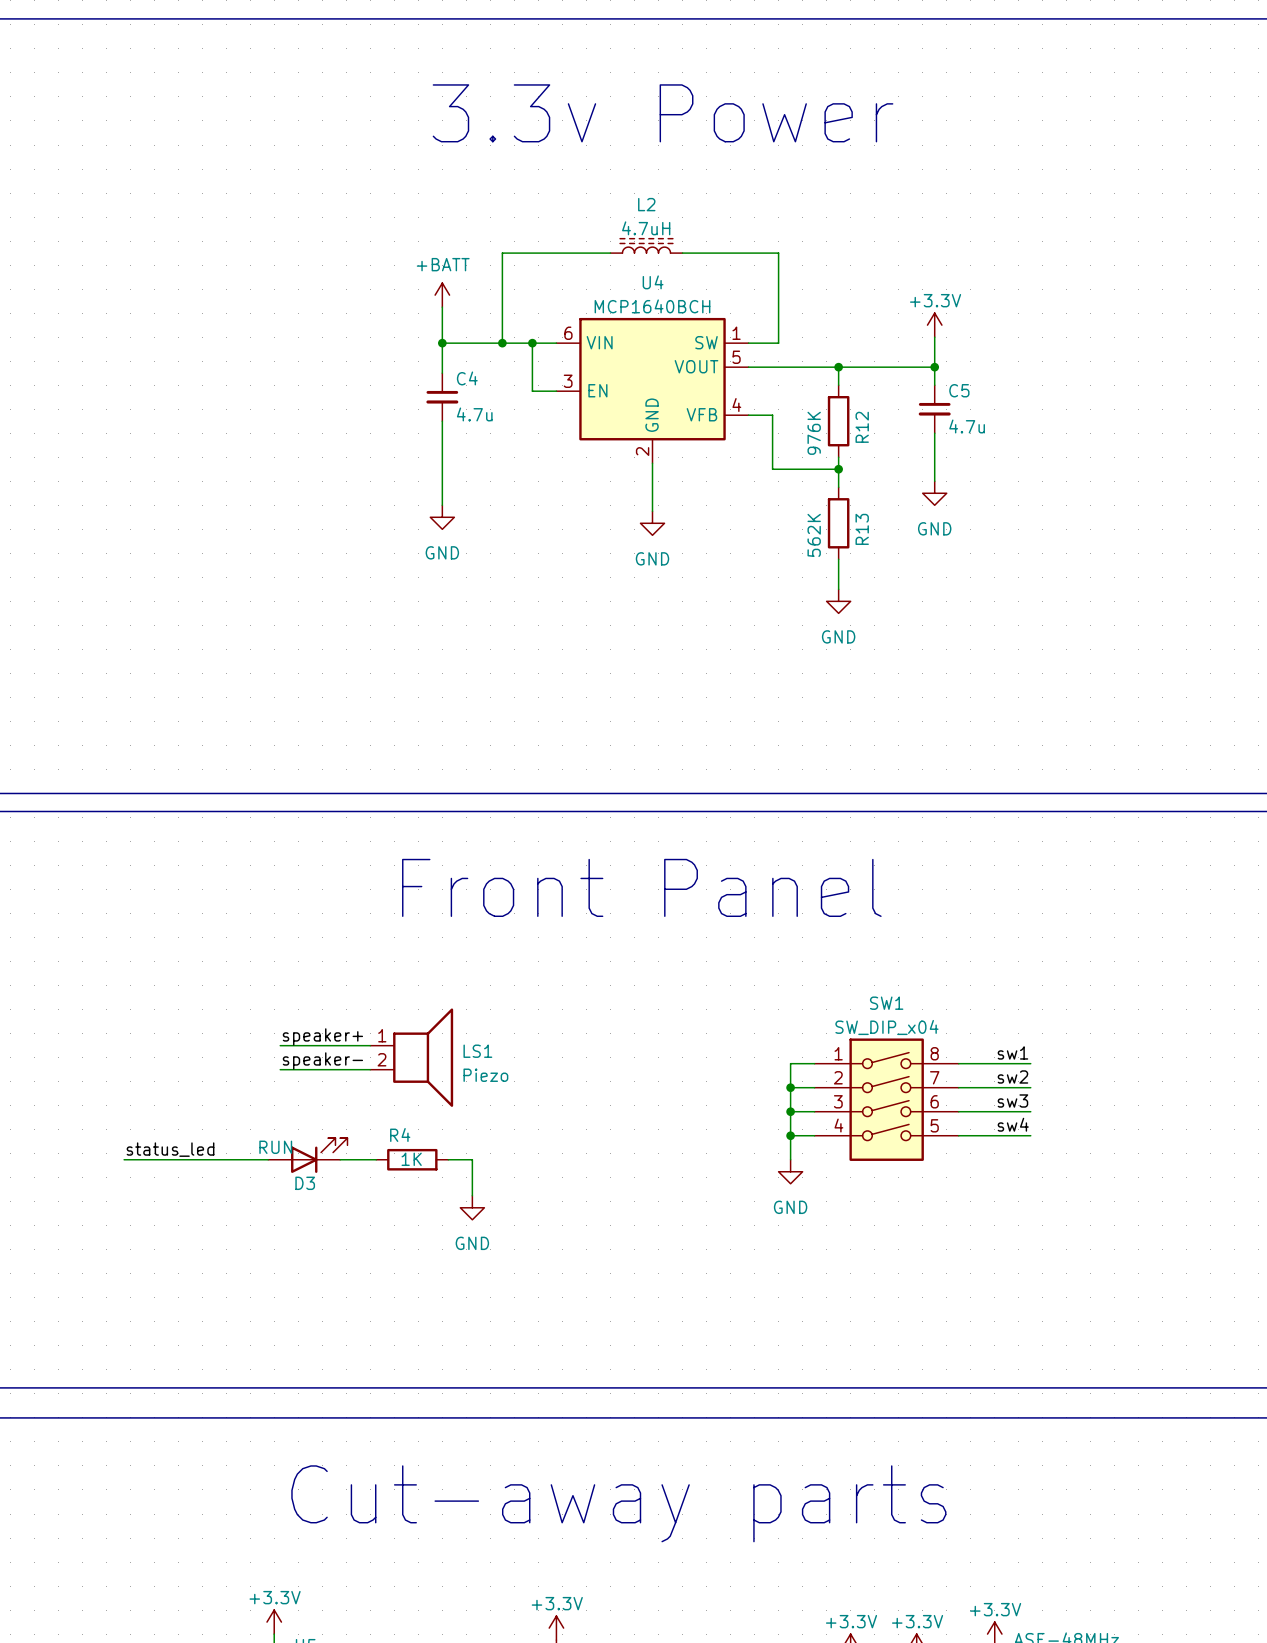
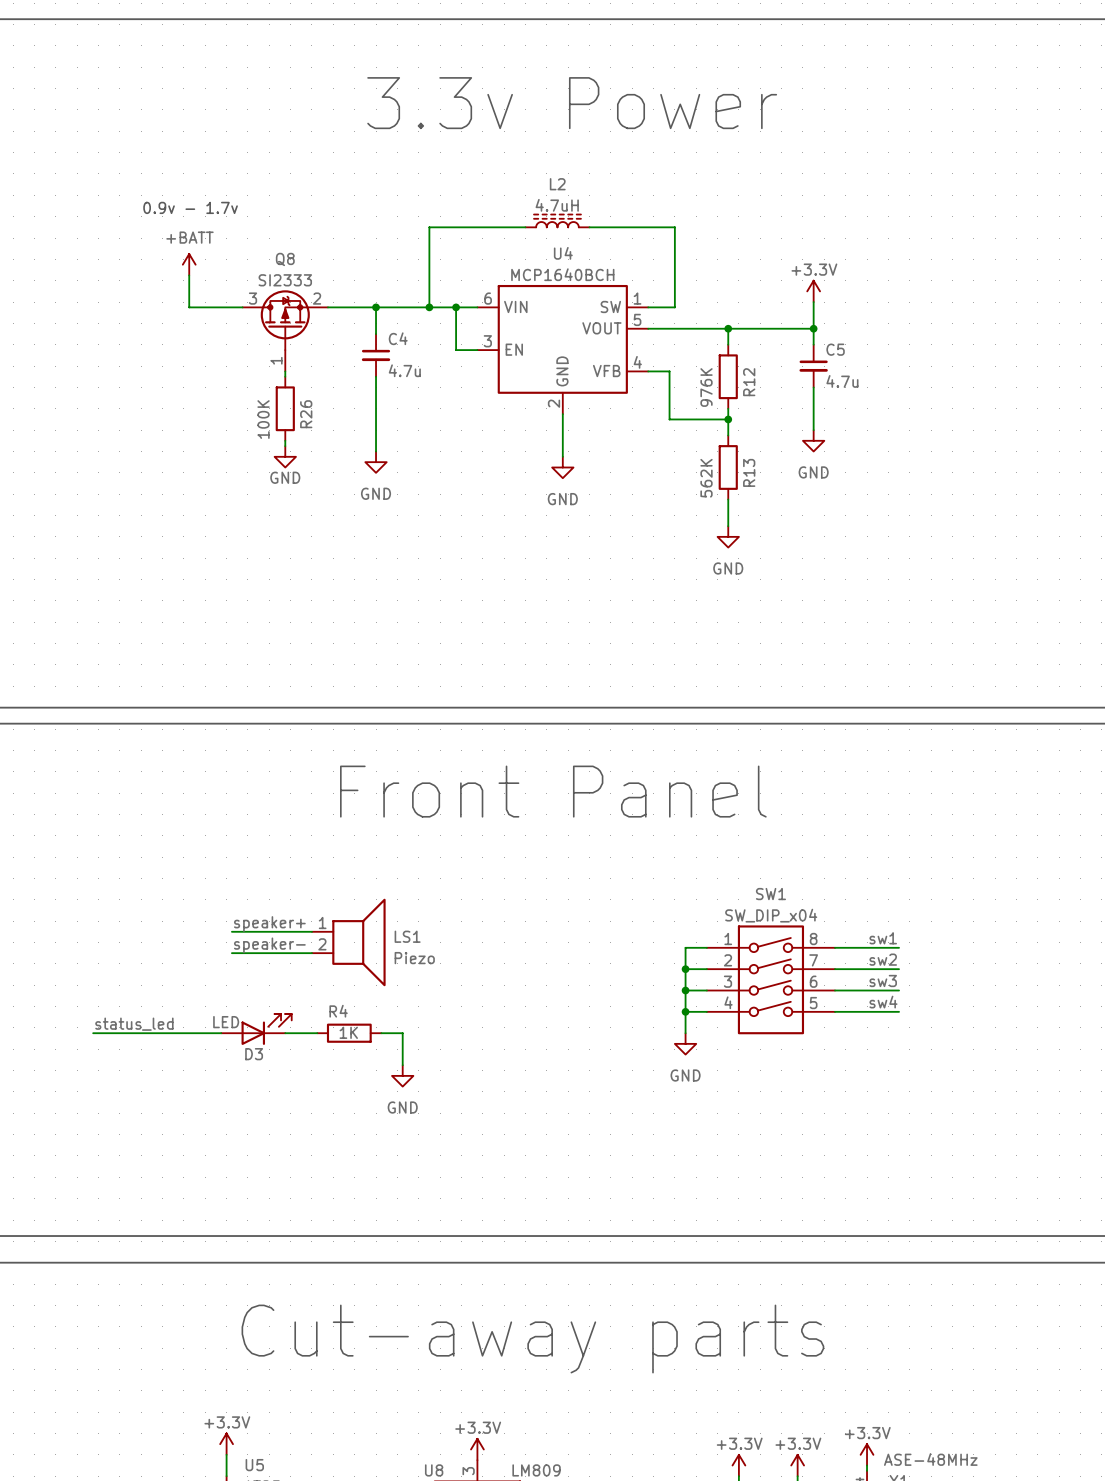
text: none -> 0.9v - 1.7v (190, 207)
power symbol position: +BATT (442, 295) -> +BATT (189, 264)
wire: none -> (189, 275) (189, 307) (242, 307)
wire: (442, 307) (442, 343) -> (327, 307) (376, 307)
Q8: none -> SI2333 (285, 330)
wire: none -> (285, 371) (285, 376)
R26: none -> 100K (285, 408)
wire: none -> (285, 440) (285, 446)
power symbol: none -> GND (285, 456)
D3 value: RUN (275, 1147) -> LED (226, 1022)

